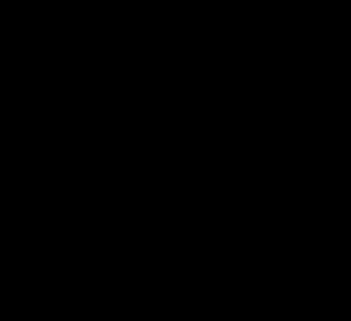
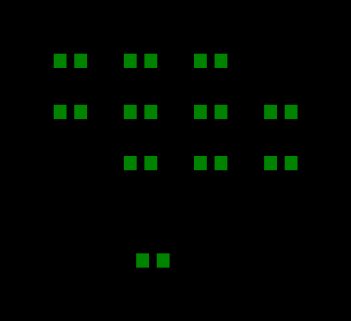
part: none -> (70, 60)
part: none -> (140, 60)
part: none -> (210, 60)
part: none -> (70, 111)
part: none -> (140, 111)
part: none -> (210, 111)
part: none -> (280, 111)
part: none -> (140, 163)
part: none -> (210, 163)
part: none -> (280, 163)
part: none -> (152, 260)

